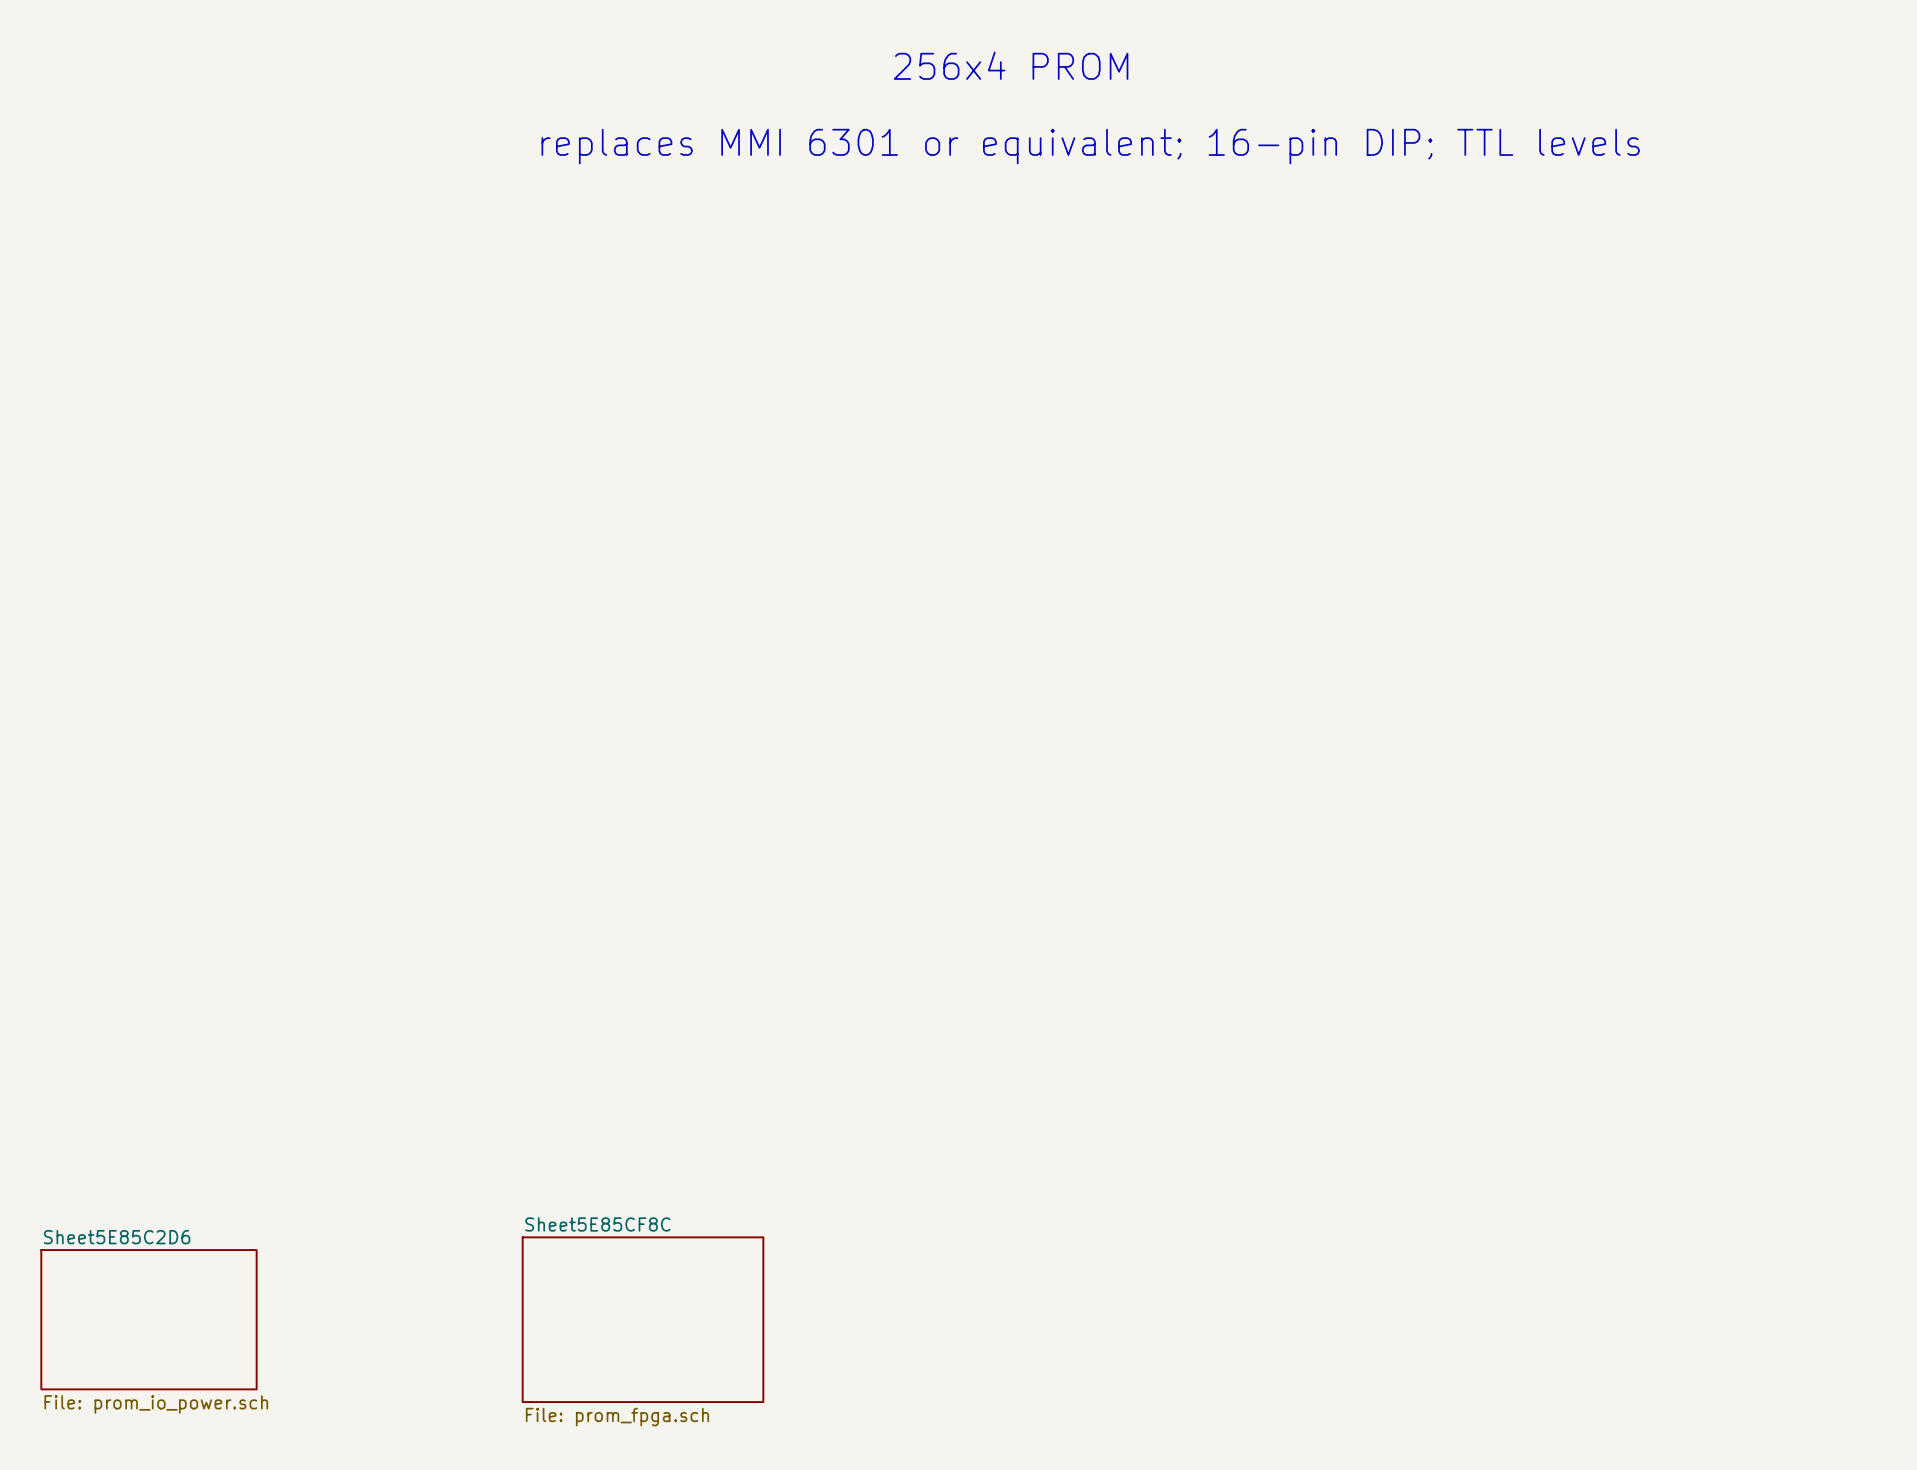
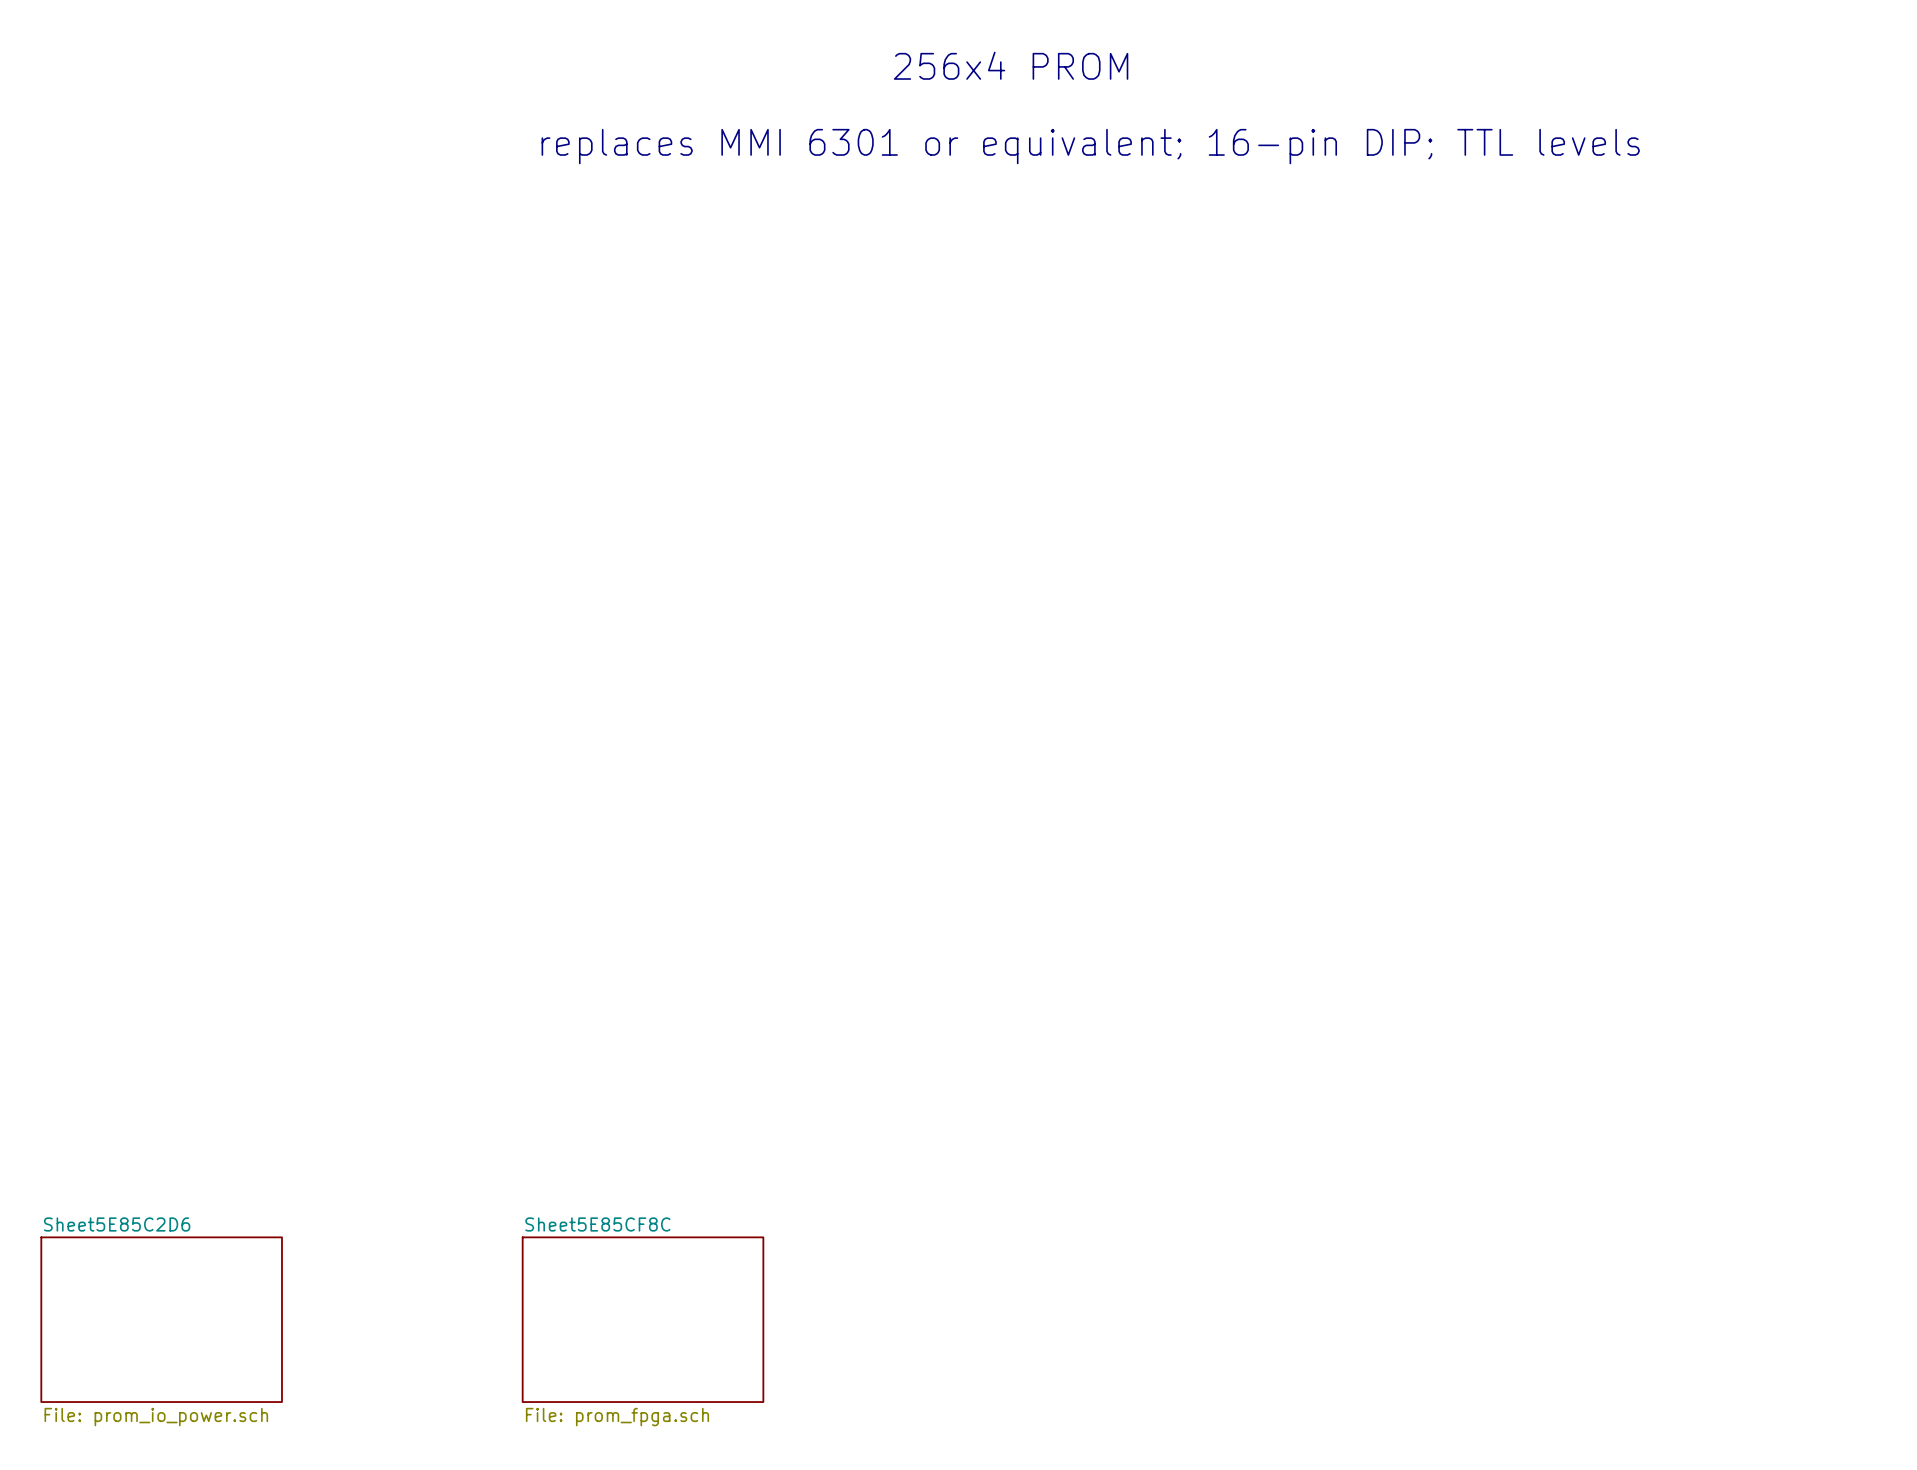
sheet Sheet5E85C2D6 shape: [41, 1250, 257, 1390] -> [41, 1237, 282, 1403]

